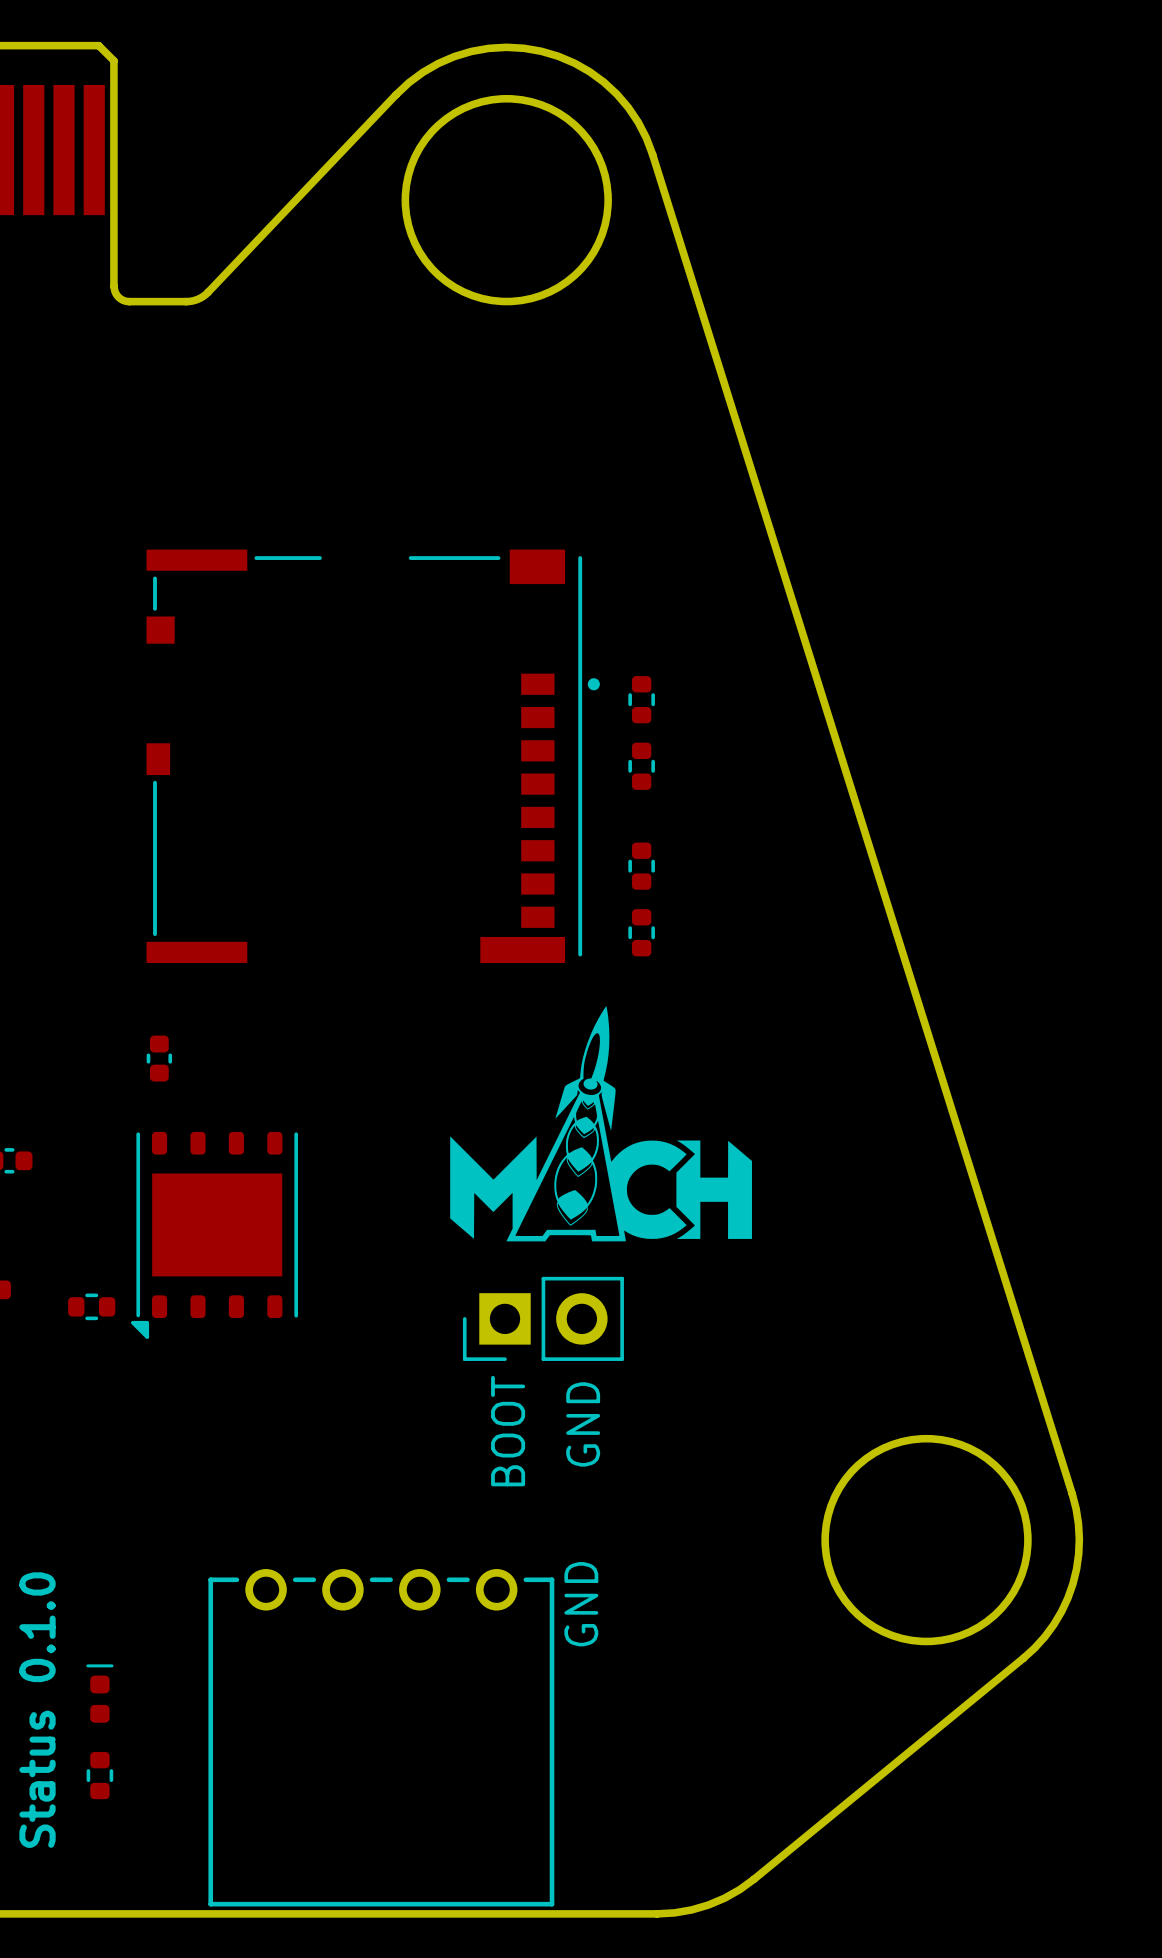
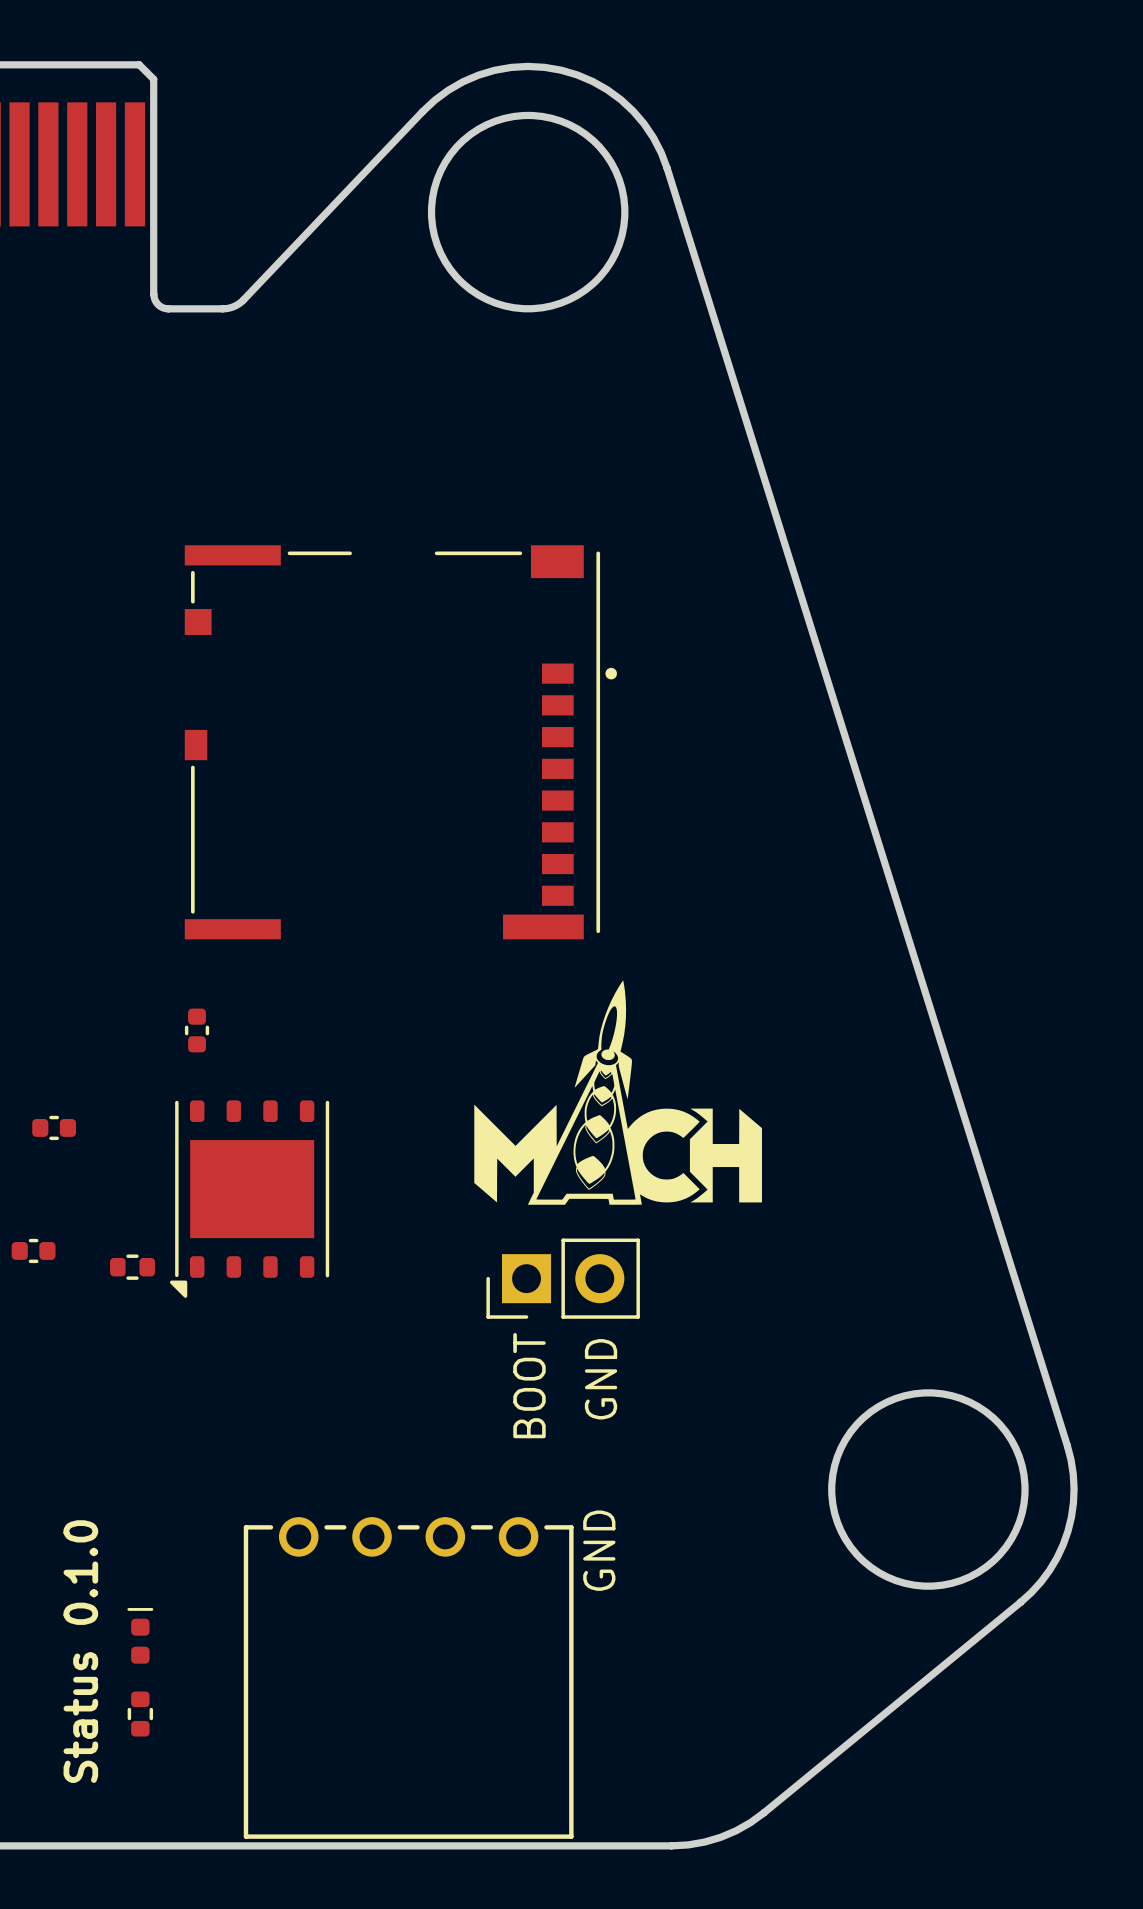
part: (641, 699) -> none
part: (641, 766) -> none
part: (641, 866) -> none
part: (641, 932) -> none

